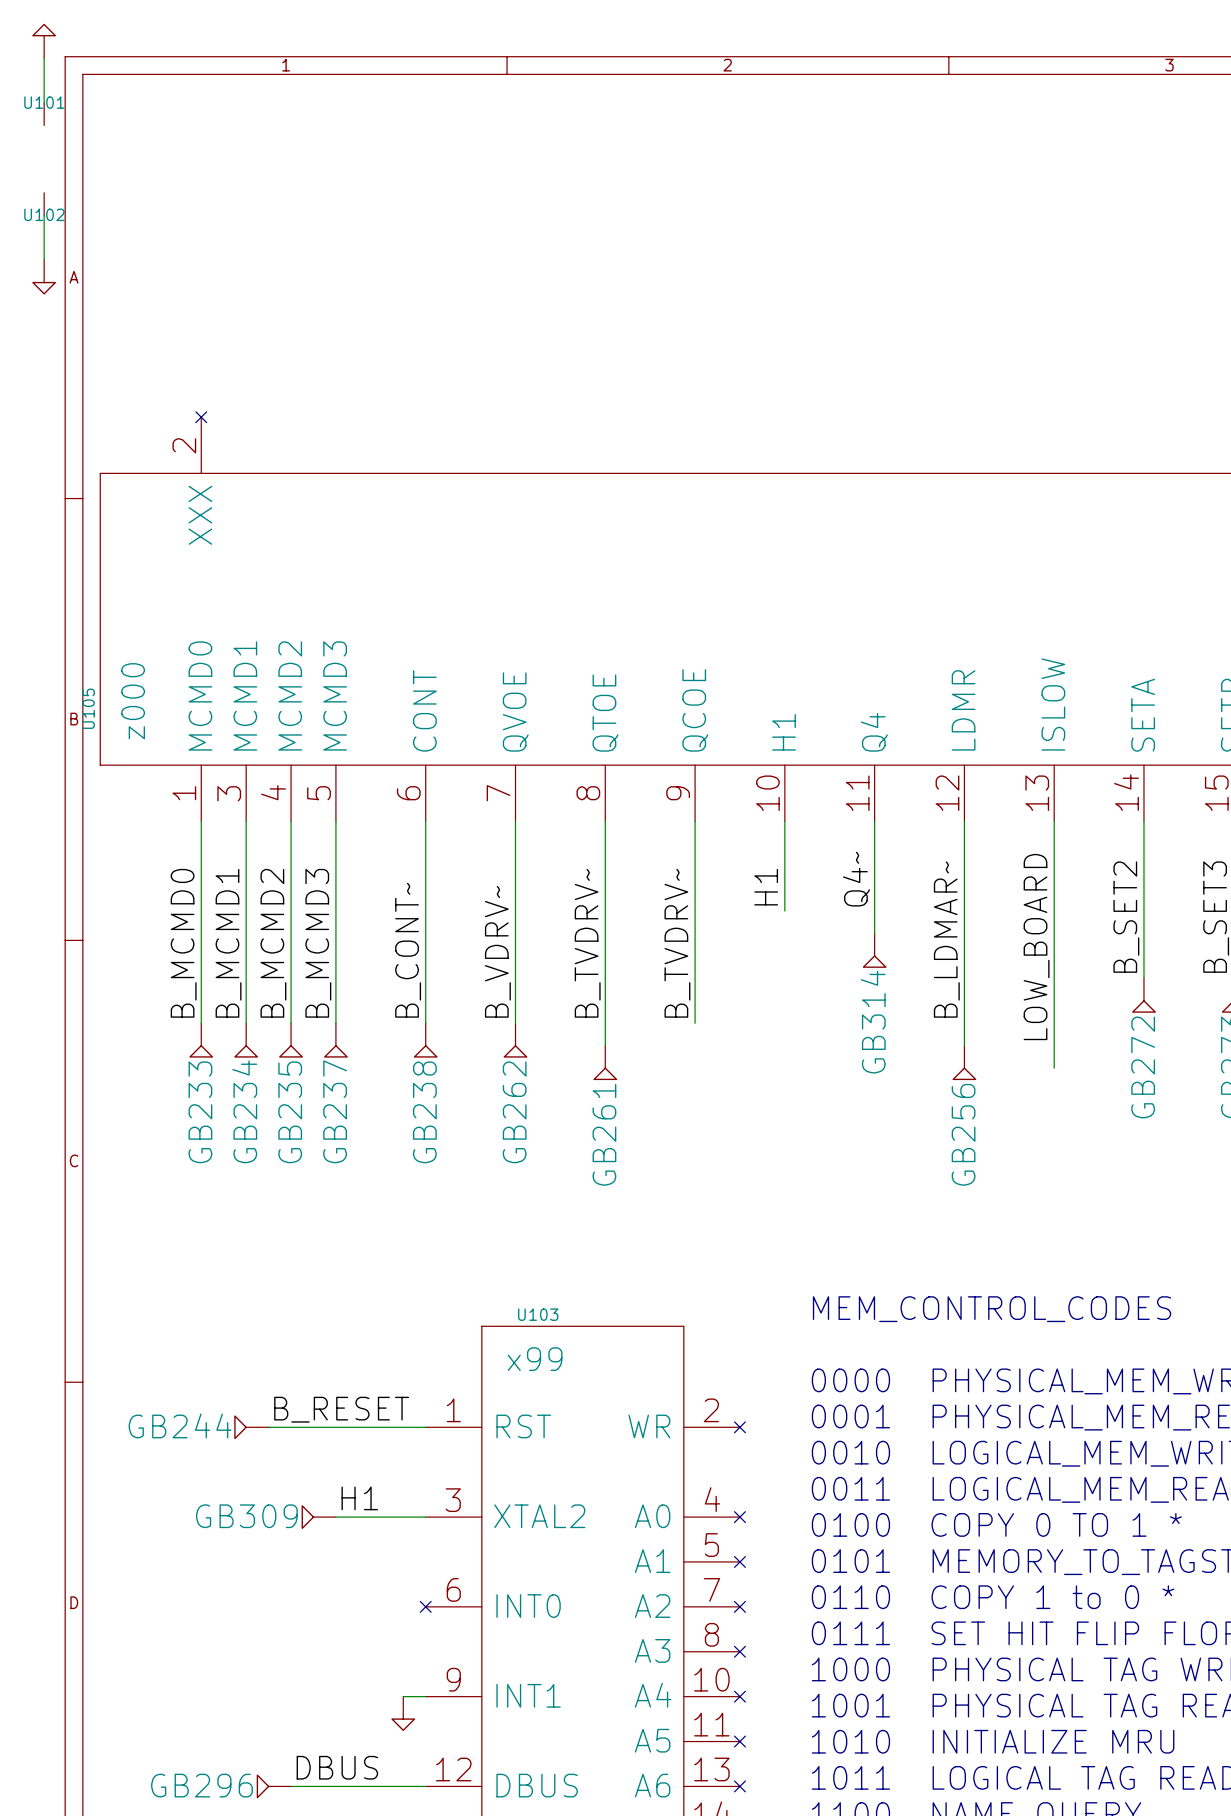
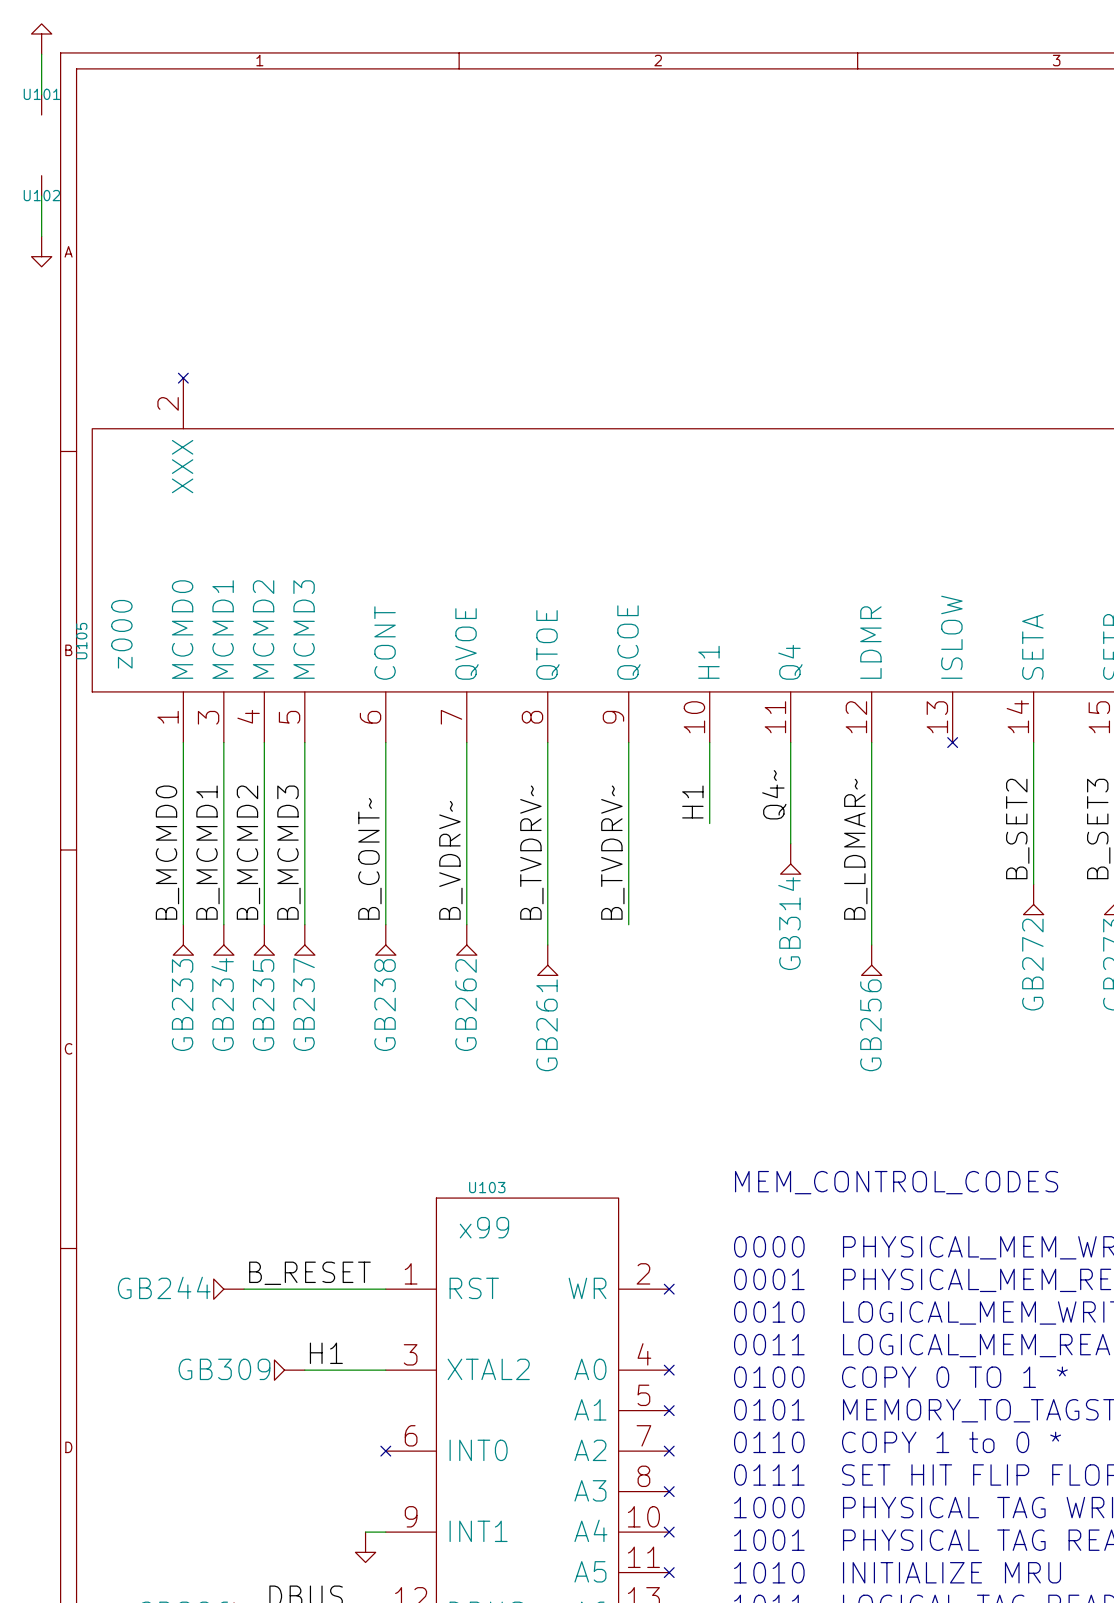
wire: (1054, 821) (1054, 1068) -> none
no-connect mark: none -> (952, 742)
label: LOW_BOARD (1036, 947) -> none

